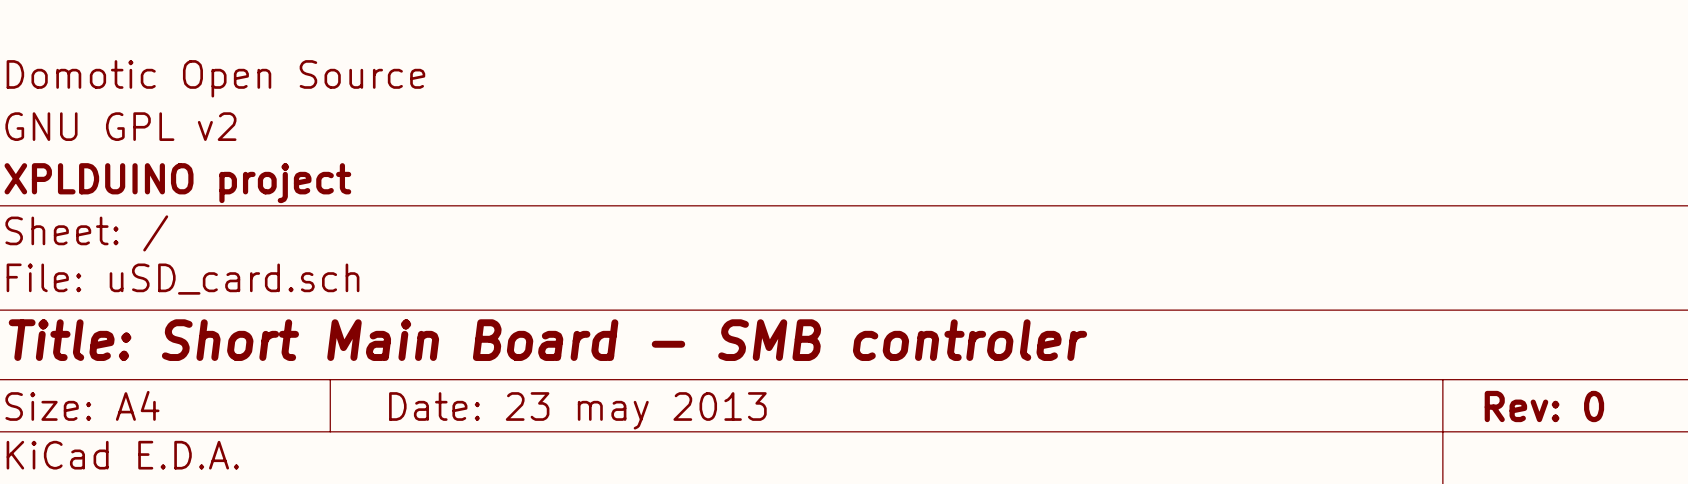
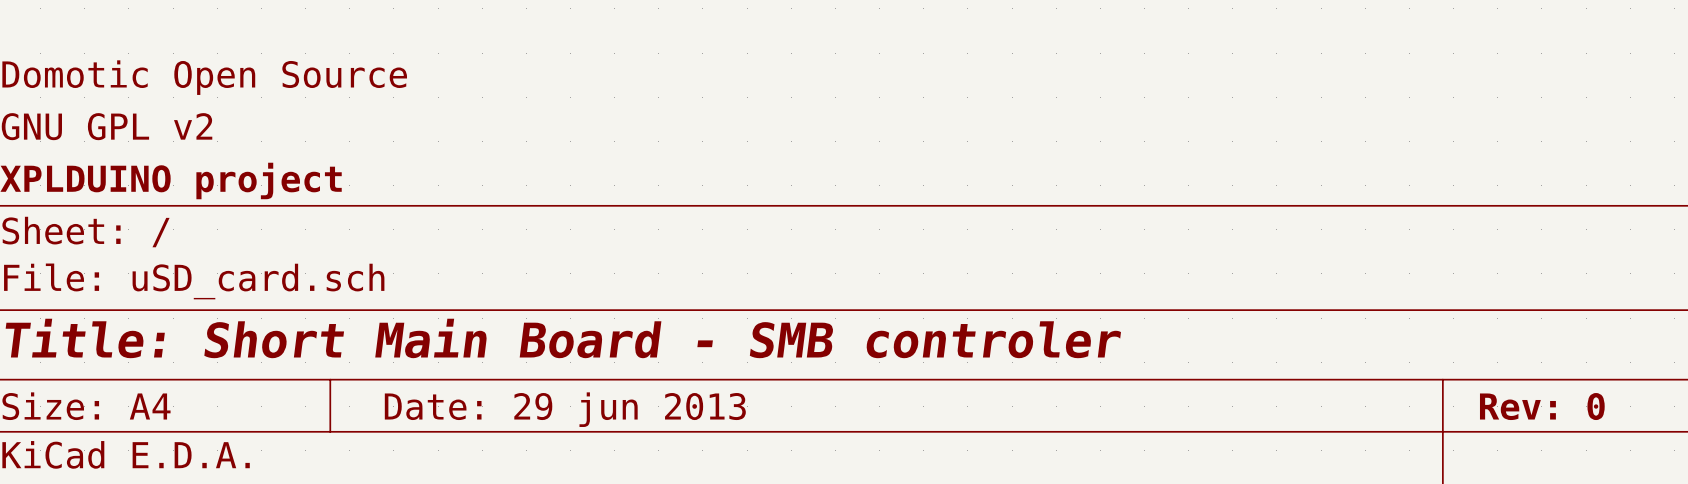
title block: Date: 23 may 2013 (577, 410) -> Date: 29 jun 2013 (565, 409)

